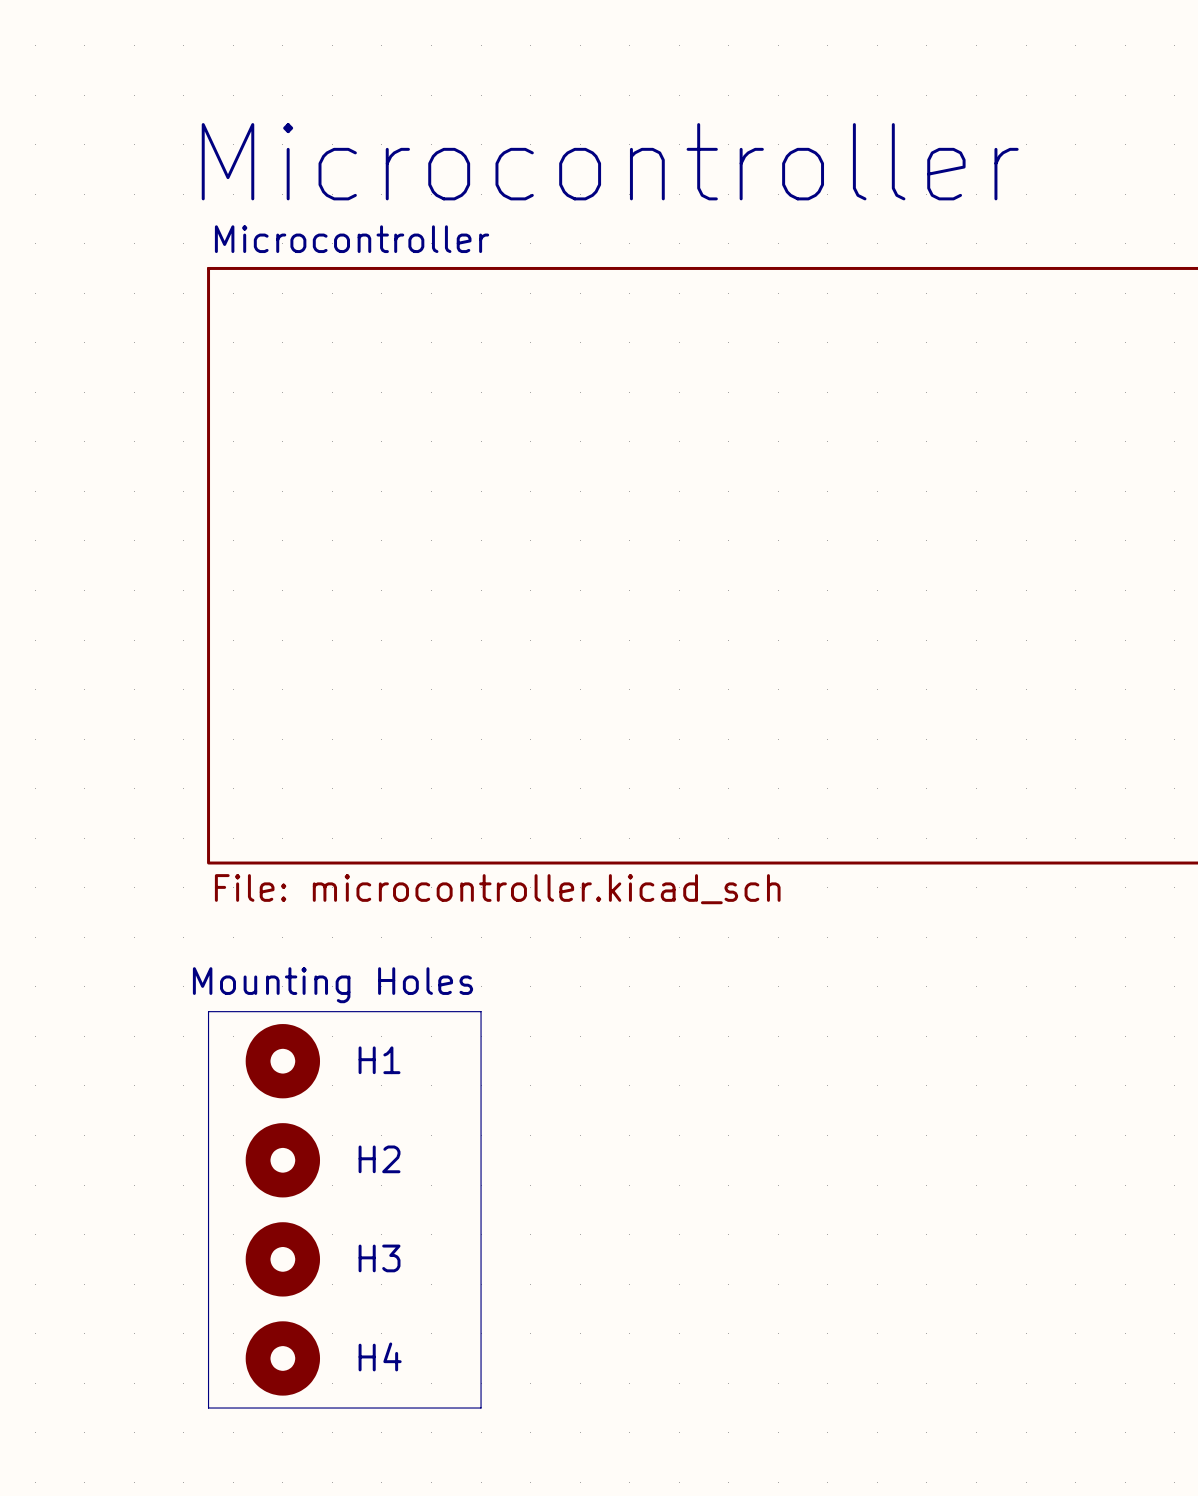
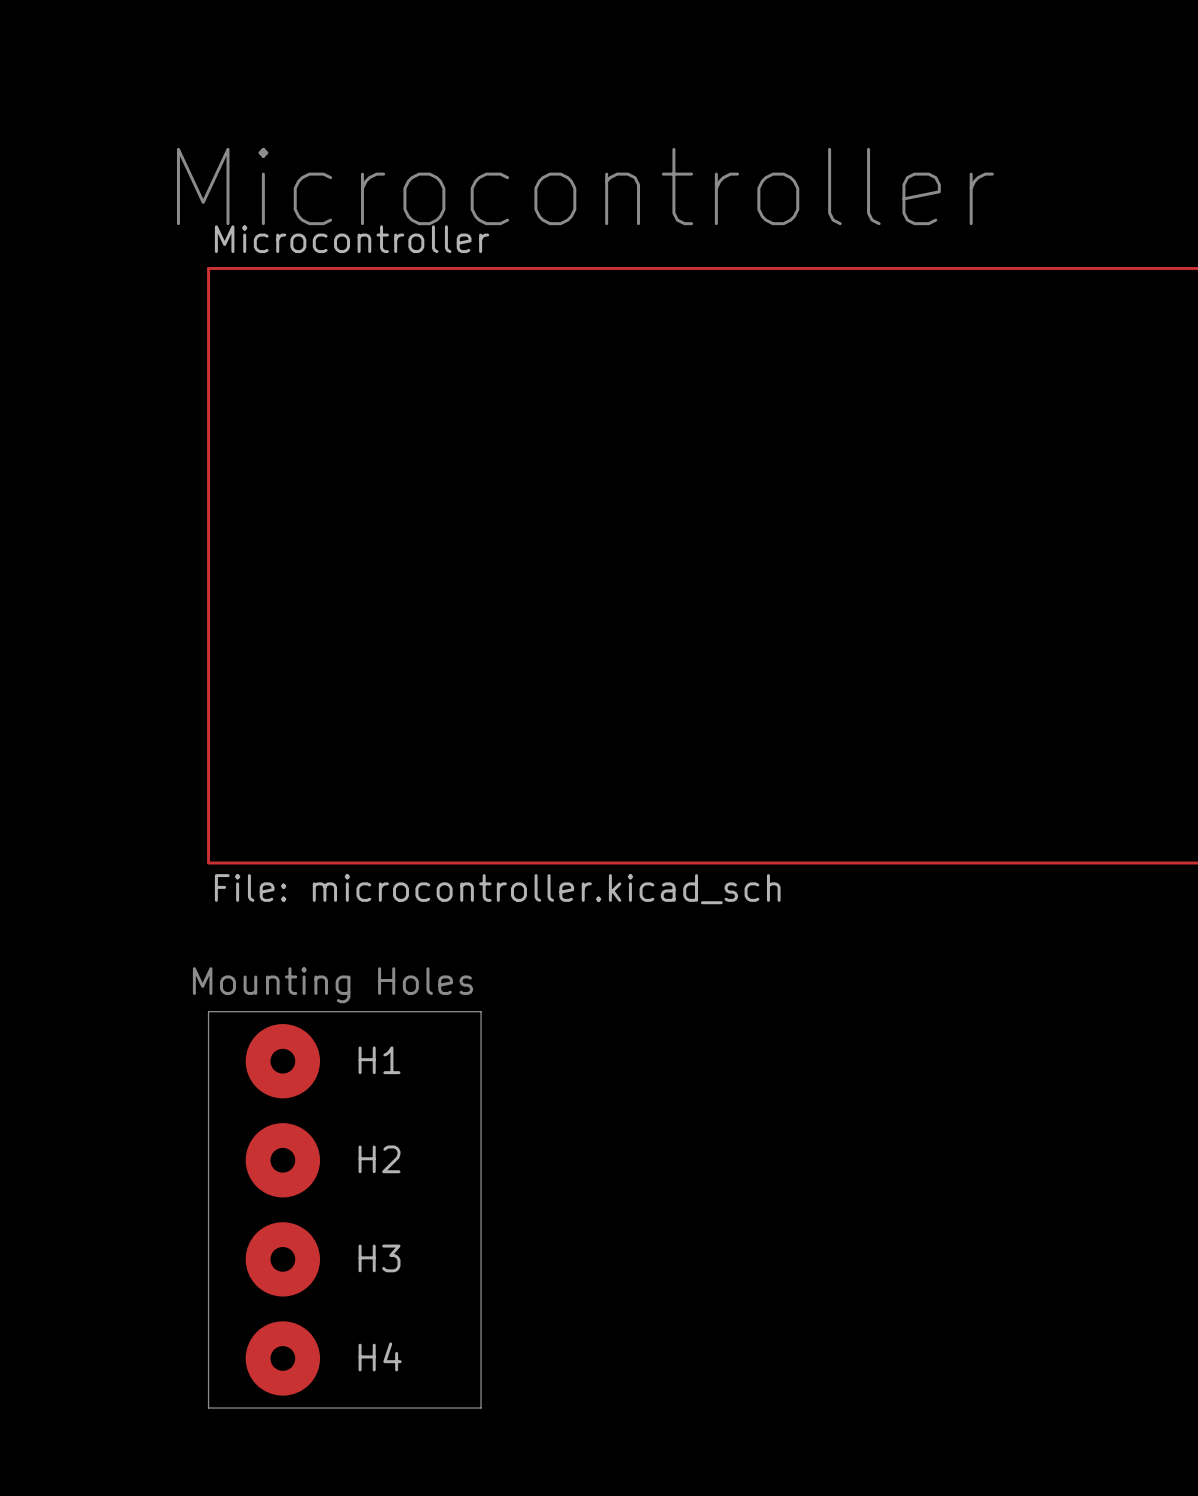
text position: Microcontroller (610, 161) -> Microcontroller (585, 186)

